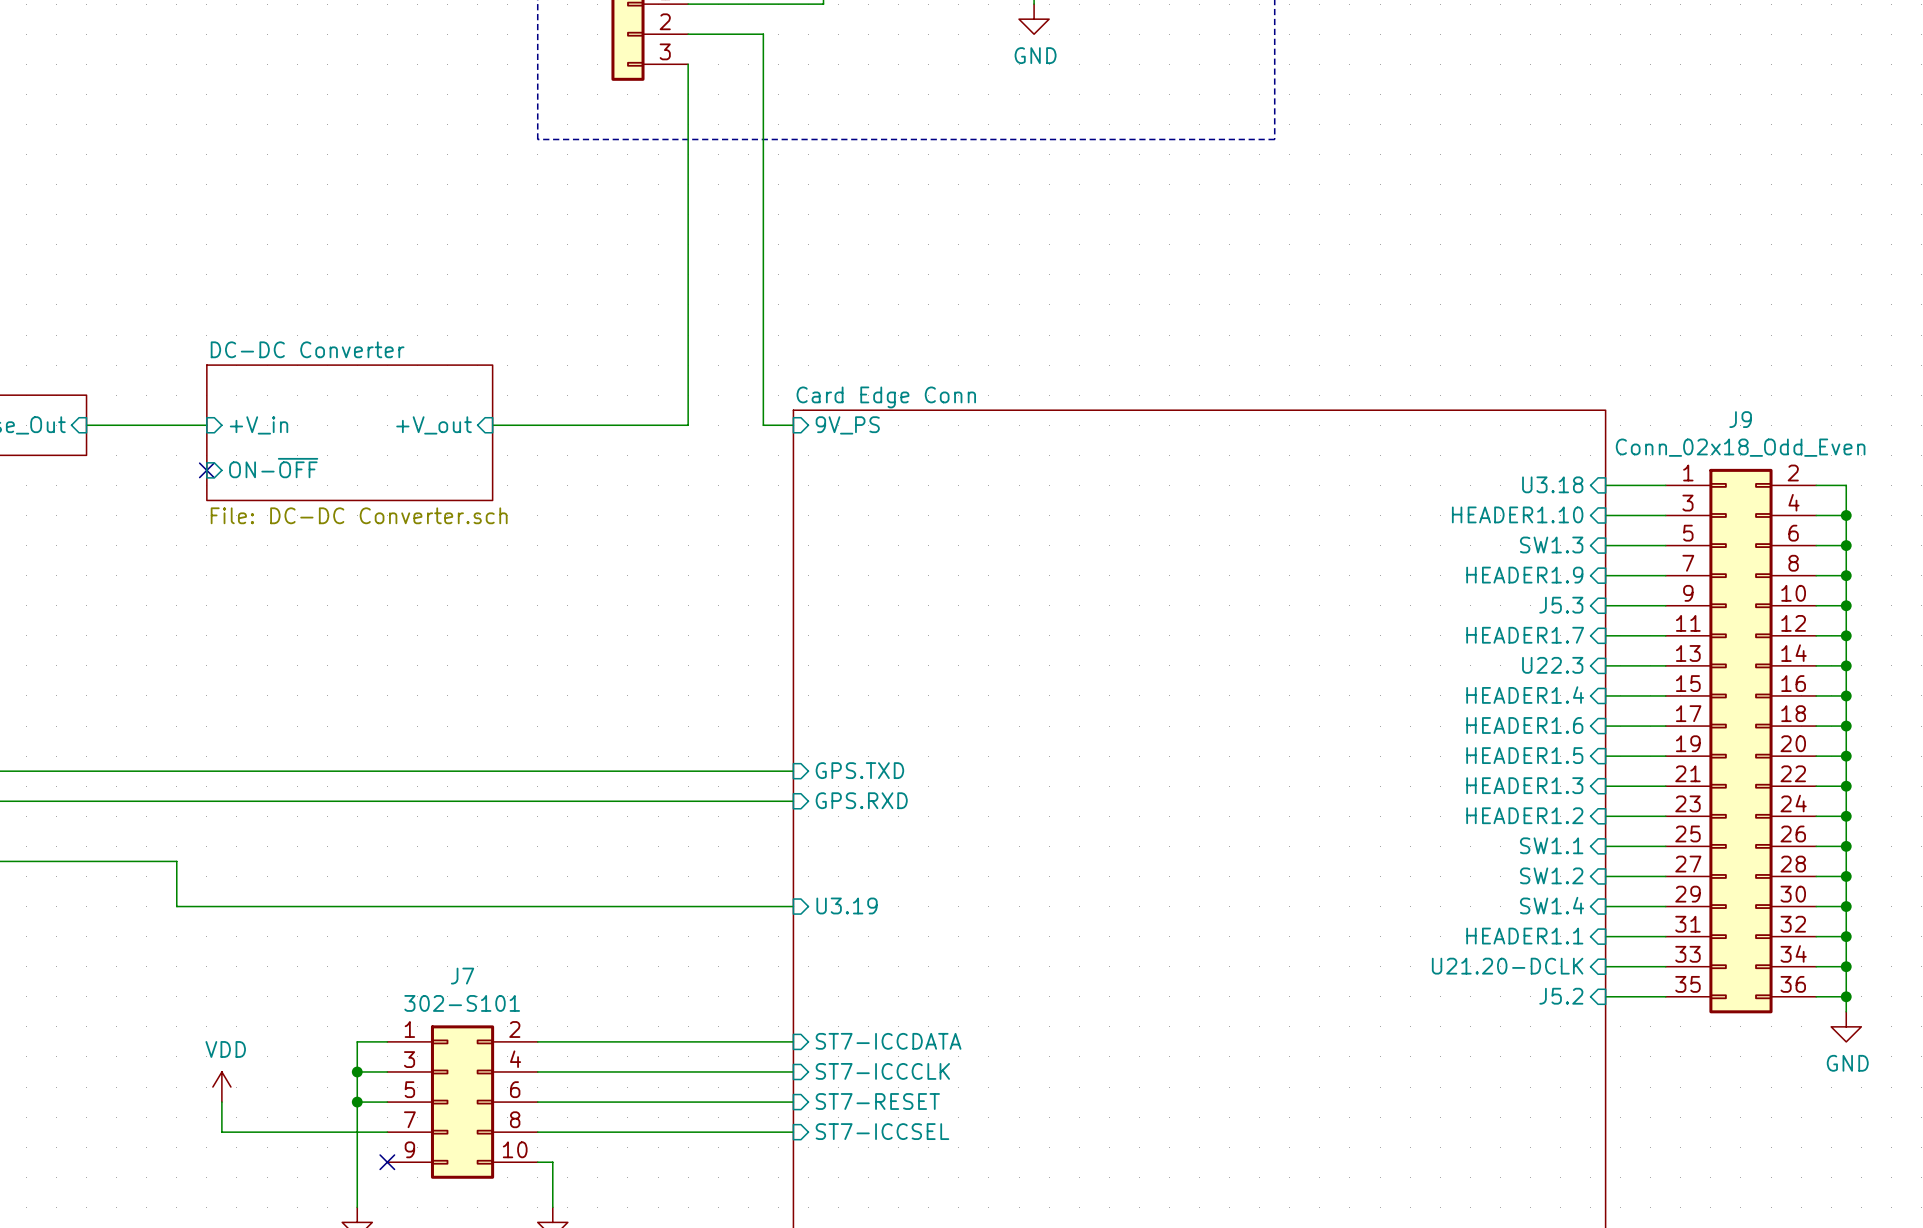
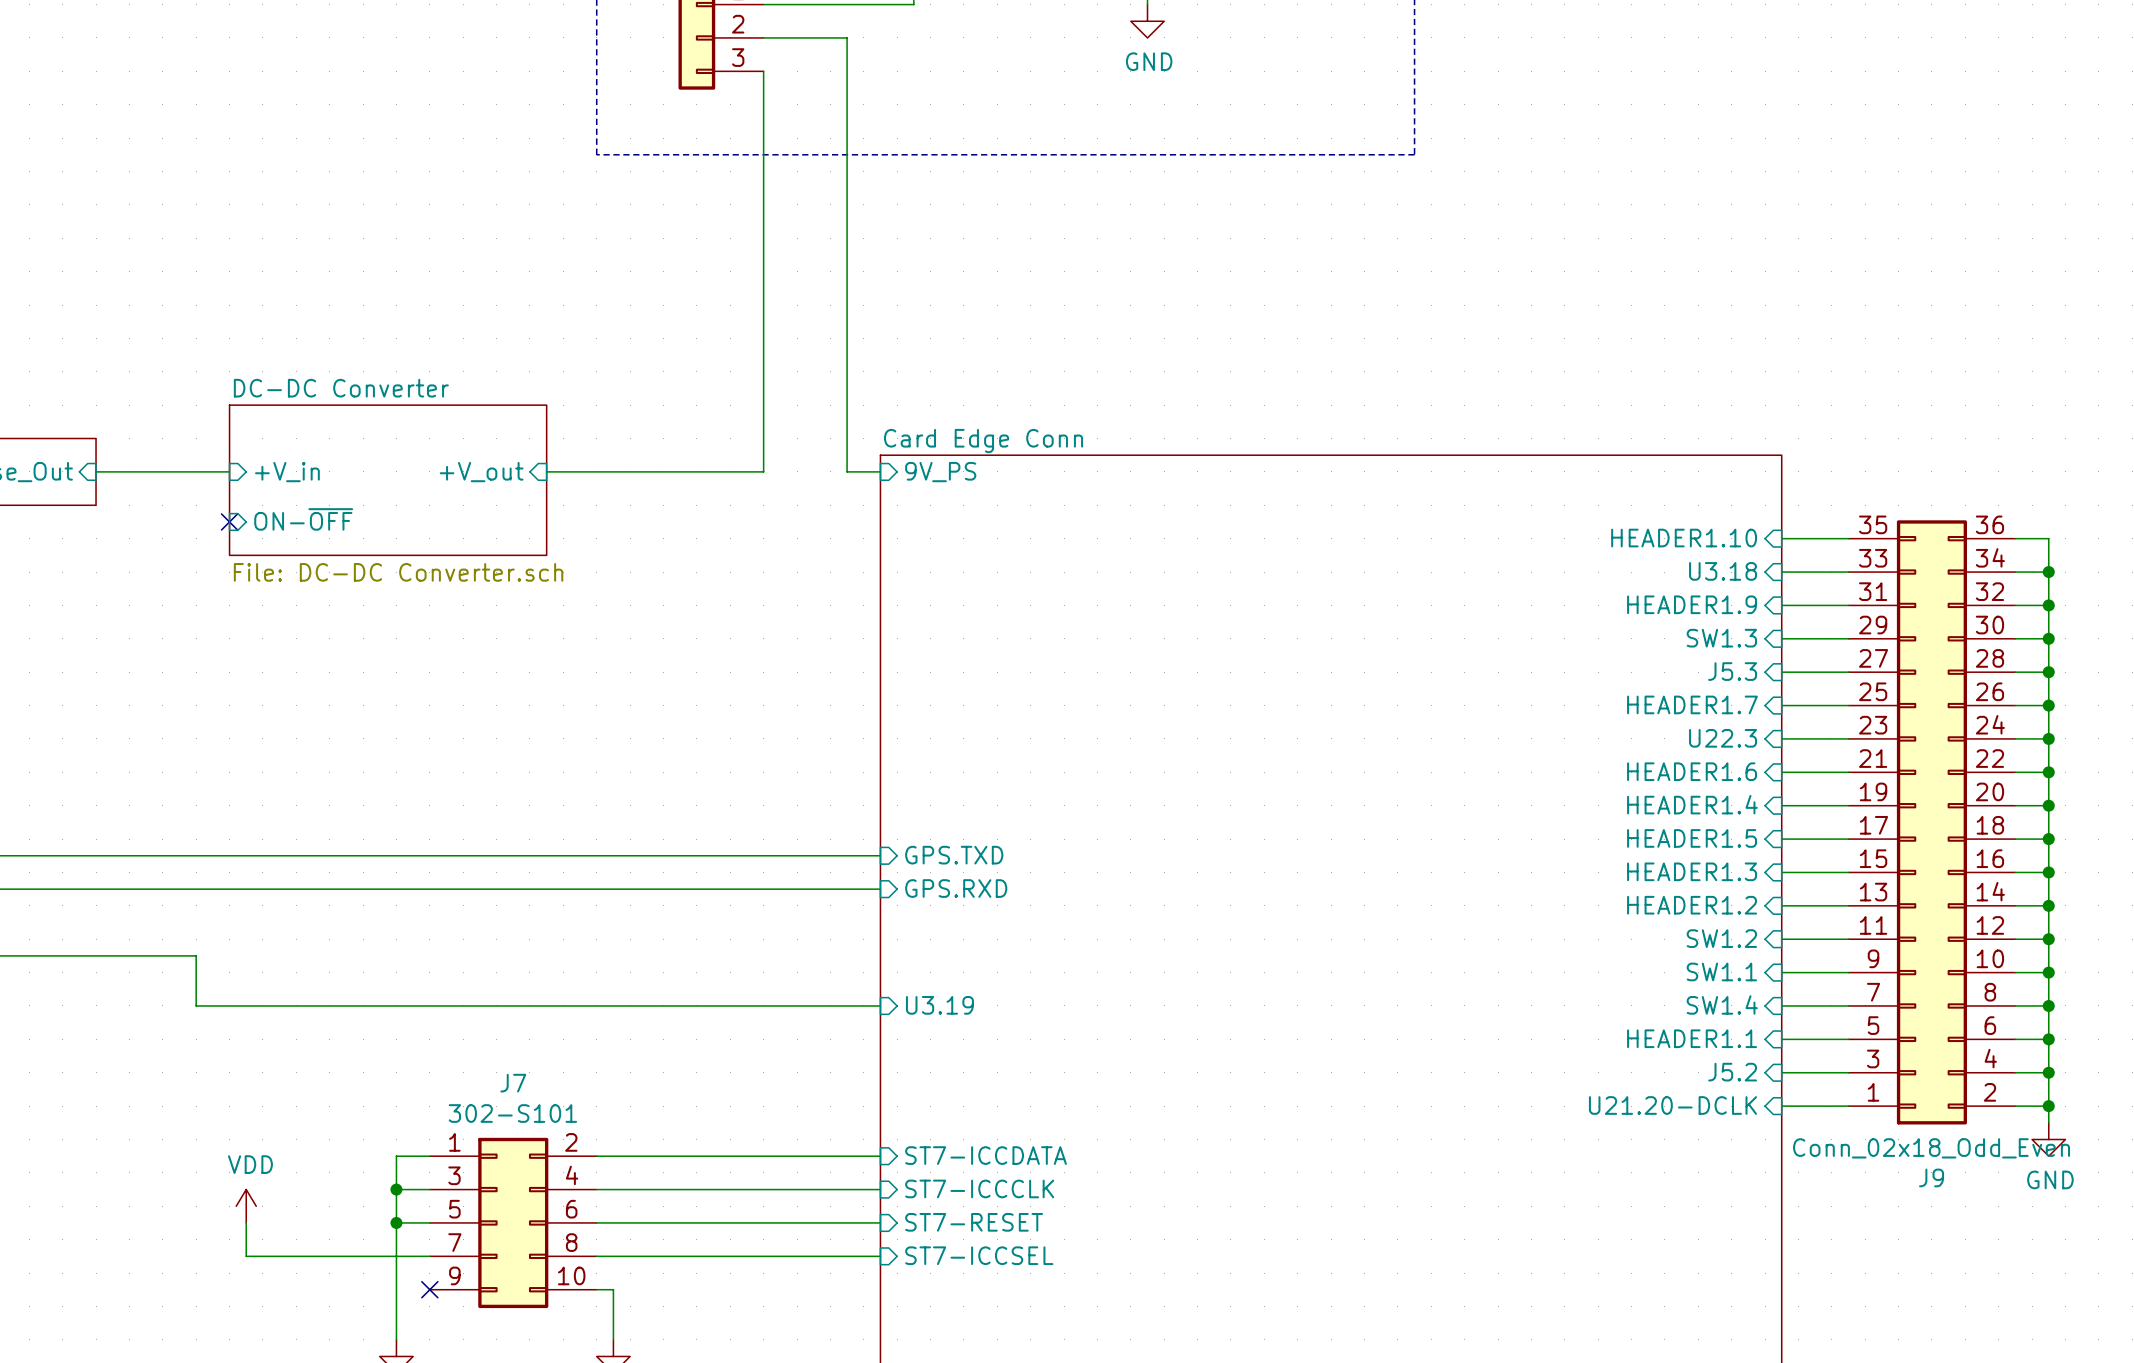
sheet pin: U3.18 (1552, 484) -> HEADER1.10 (1684, 538)
sheet pin: HEADER1.10 (1517, 514) -> U3.18 (1723, 571)
sheet pin: SW1.3 (1551, 545) -> HEADER1.9 (1692, 604)
sheet pin: HEADER1.9 (1524, 575) -> SW1.3 (1721, 638)
sheet pin: HEADER1.4 (1525, 695) -> HEADER1.6 (1692, 771)
sheet pin: HEADER1.6 (1524, 725) -> HEADER1.4 (1692, 804)
J9 flip: as is (1740, 741) -> up-down (1931, 822)
sheet pin: SW1.1 (1551, 845) -> SW1.2 (1721, 938)
sheet pin: SW1.2 (1551, 875) -> SW1.1 (1721, 971)
sheet pin: U21.20-DCLK (1507, 966) -> J5.2 (1732, 1072)
sheet pin: J5.2 (1561, 996) -> U21.20-DCLK (1672, 1105)

